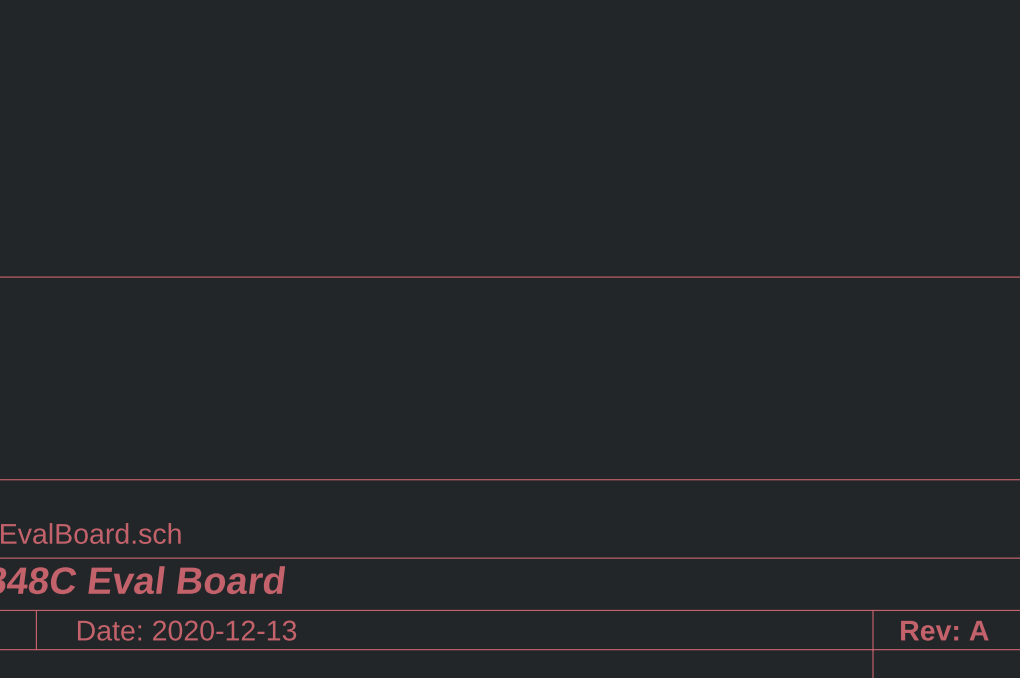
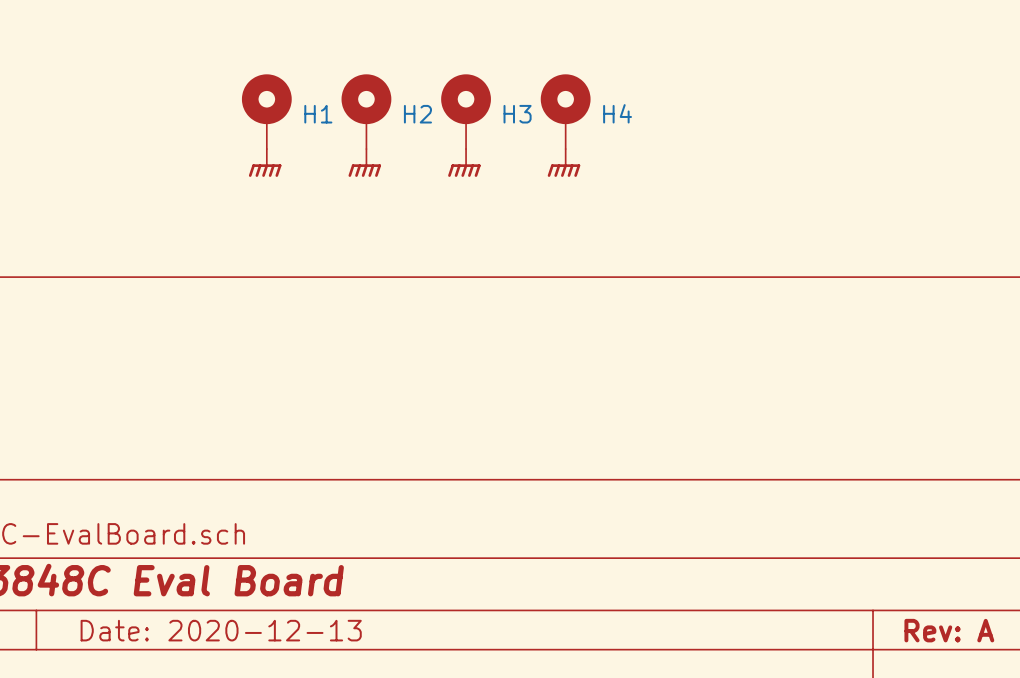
H1: none -> (266, 111)
H2: none -> (366, 111)
H3: none -> (466, 111)
H4: none -> (565, 111)
power symbol: none -> (265, 162)
power symbol: none -> (364, 162)
power symbol: none -> (464, 162)
power symbol: none -> (563, 162)

